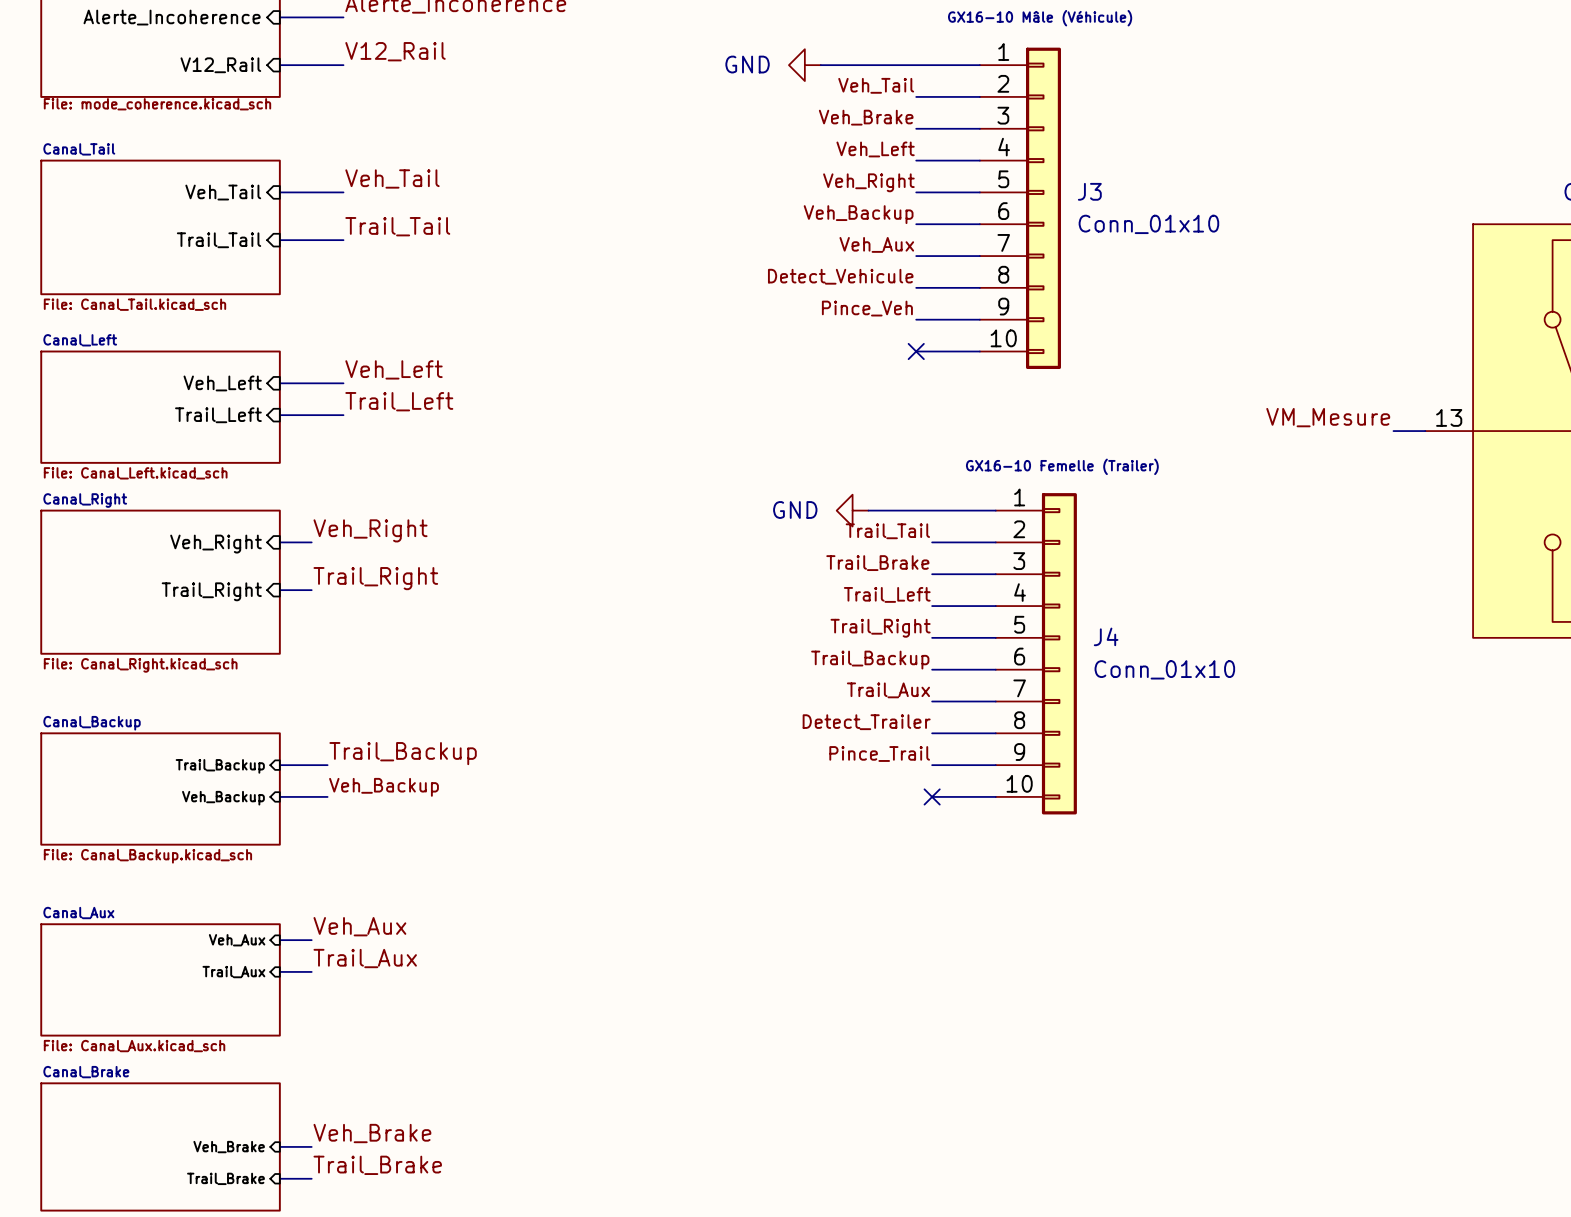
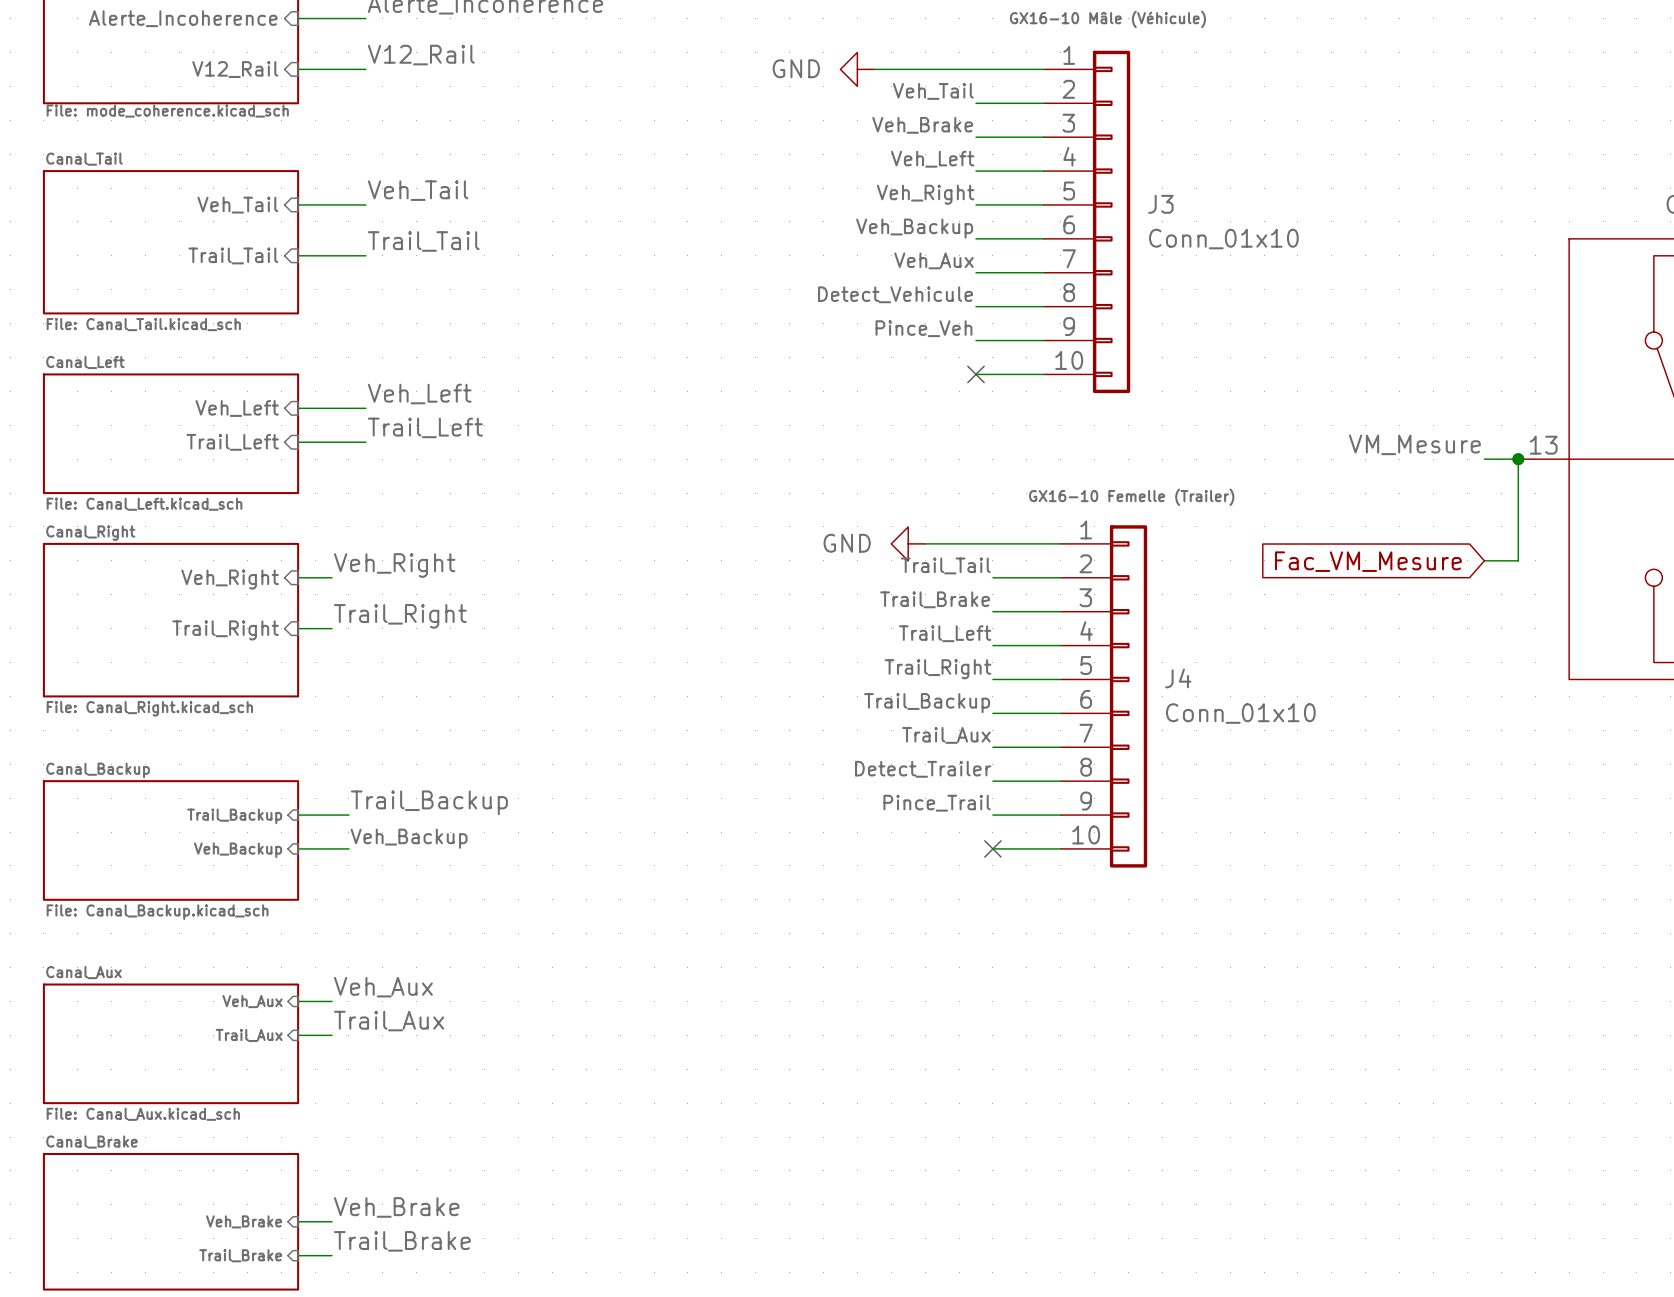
wire: none -> (1518, 459) (1518, 560) (1484, 560)
junction: none -> (1518, 459)
global label: none -> Fac_VM_Mesure (1368, 561)

